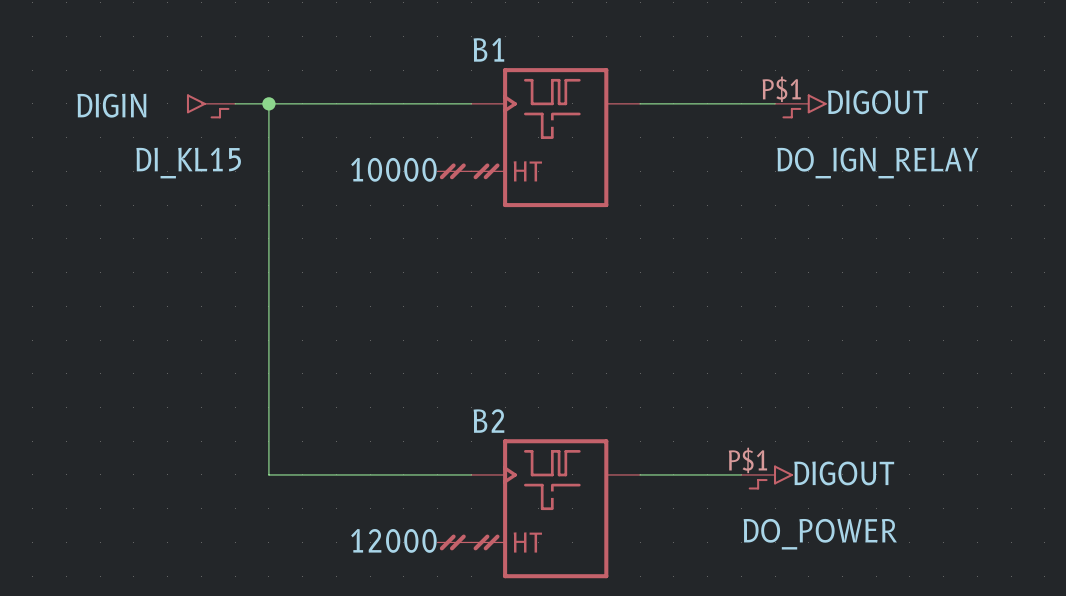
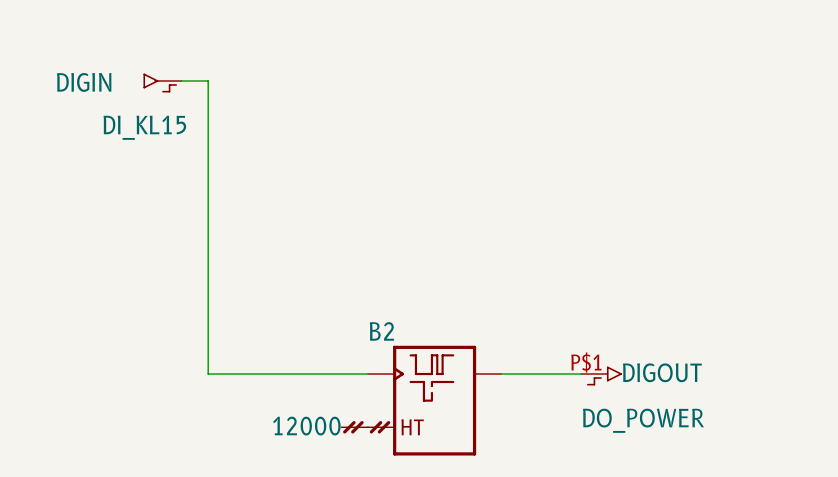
wire: (268, 103) (471, 103) -> none
junction: (268, 103) -> none
wire: (640, 103) (775, 103) -> none
part: DO_IGN_RELAY (800, 106) -> none
B1: (555, 137) -> none
part: 10000 (454, 171) -> none

